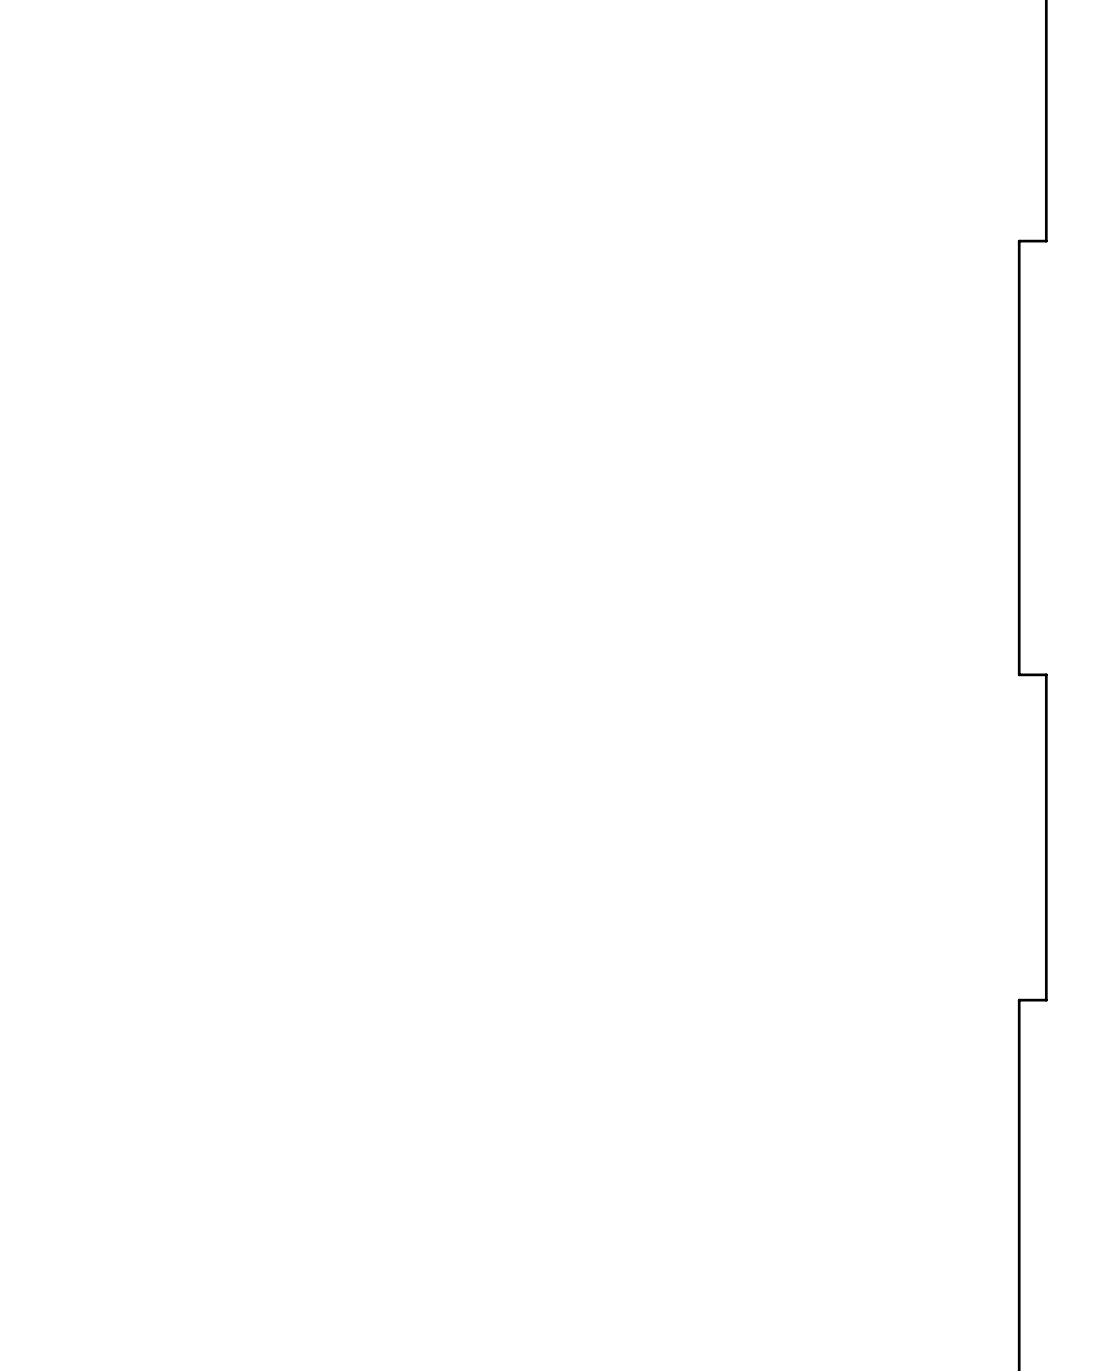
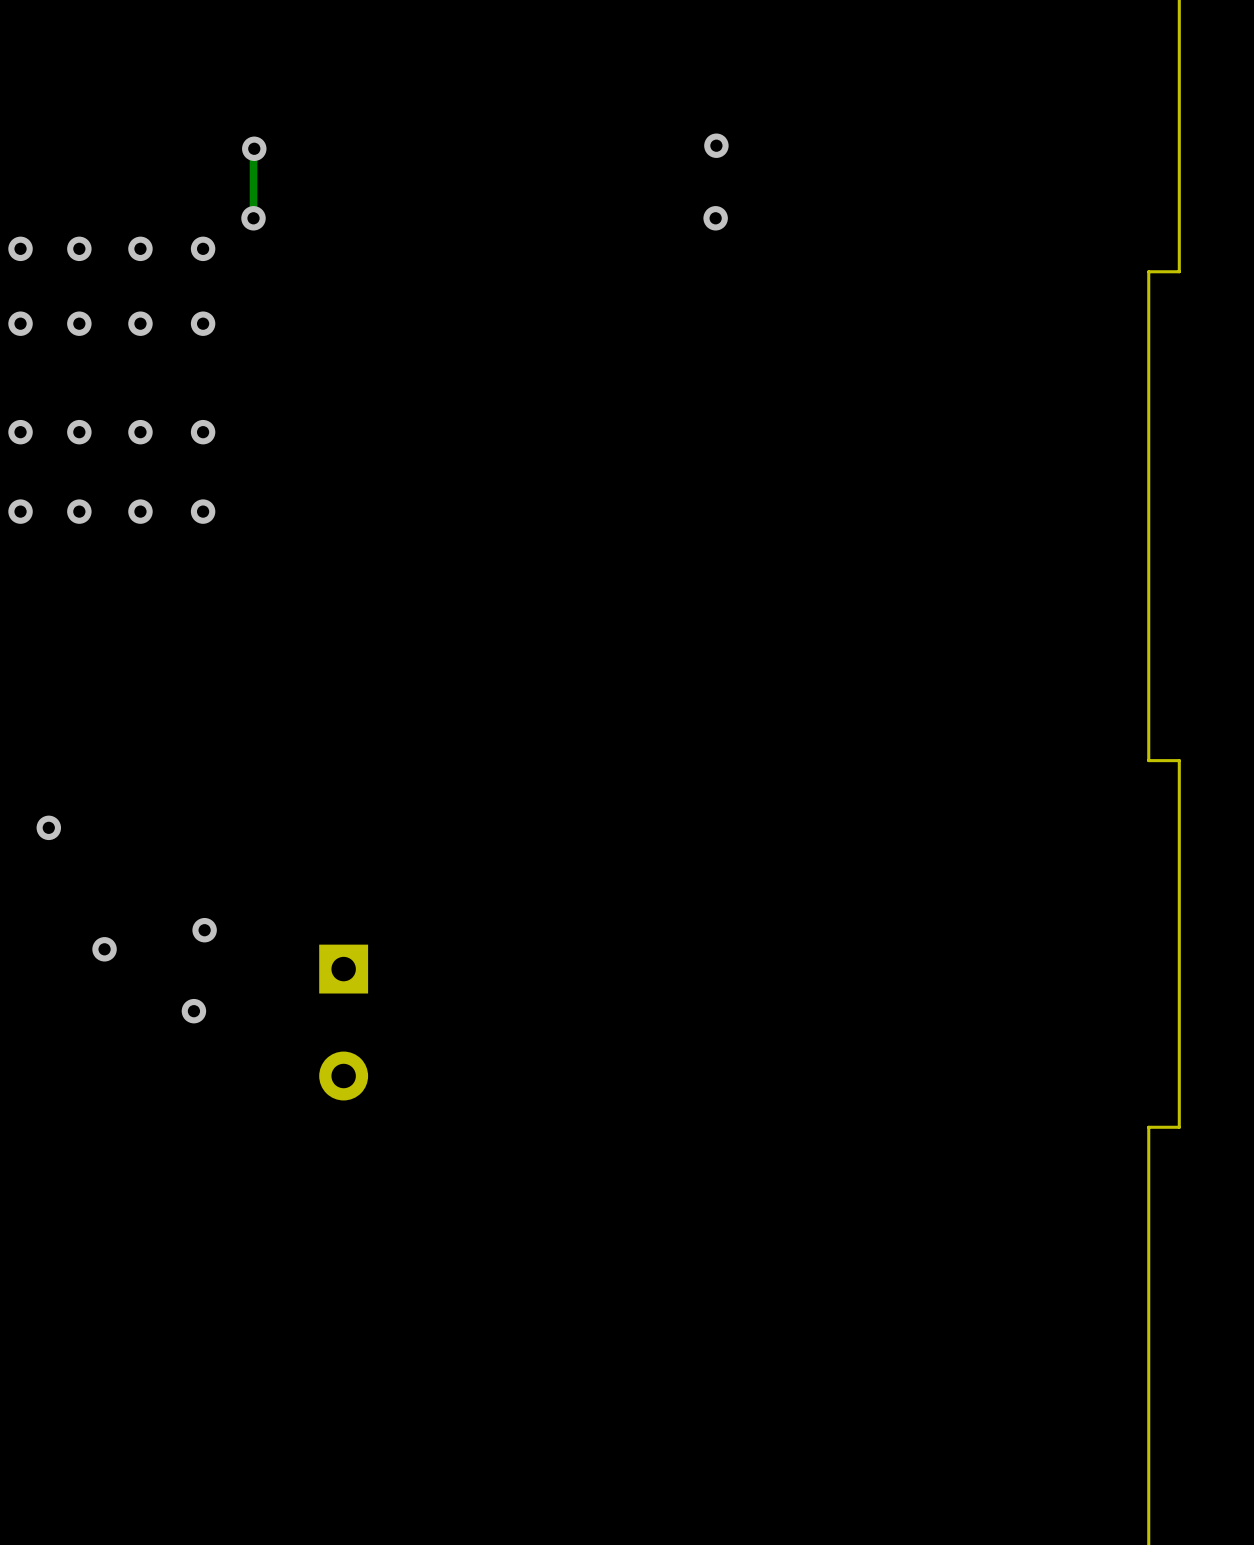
via: none -> (716, 145)
track: none -> (254, 148) (253, 218)
via: none -> (254, 148)
via: none -> (253, 218)
via: none -> (715, 218)
via: none -> (20, 248)
via: none -> (79, 248)
via: none -> (140, 248)
via: none -> (203, 248)
via: none -> (20, 323)
via: none -> (79, 323)
via: none -> (140, 323)
via: none -> (203, 323)
via: none -> (20, 432)
via: none -> (79, 432)
via: none -> (140, 432)
via: none -> (203, 432)
via: none -> (20, 511)
via: none -> (79, 511)
via: none -> (140, 511)
via: none -> (203, 511)
via: none -> (48, 827)
via: none -> (204, 930)
via: none -> (104, 949)
via: none -> (193, 1011)
part: none -> (343, 1022)

